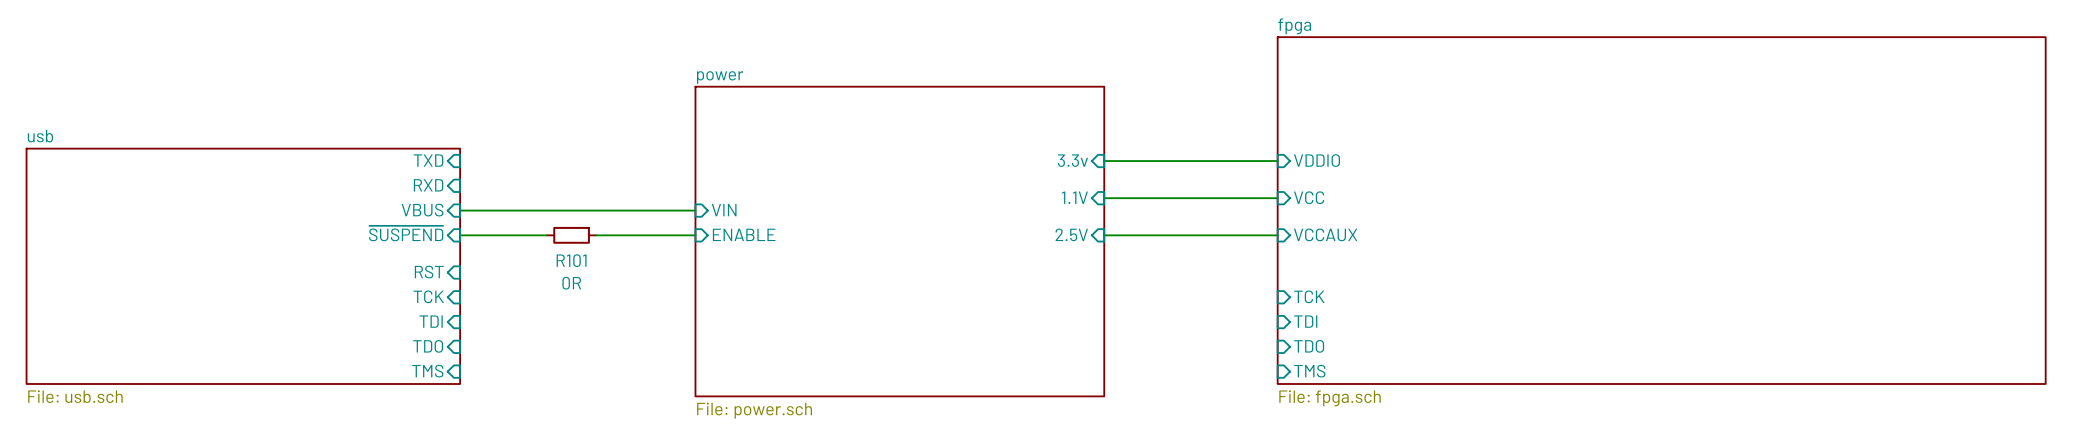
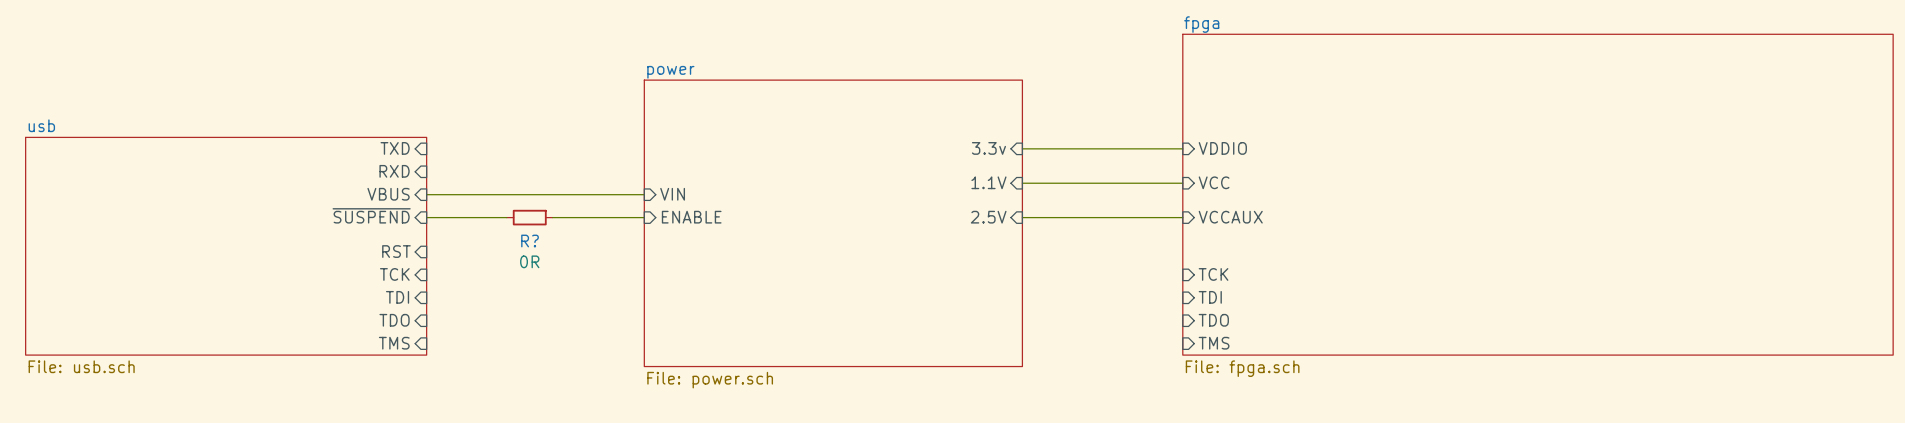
R101 name: R101 (571, 260) -> R? (530, 241)

